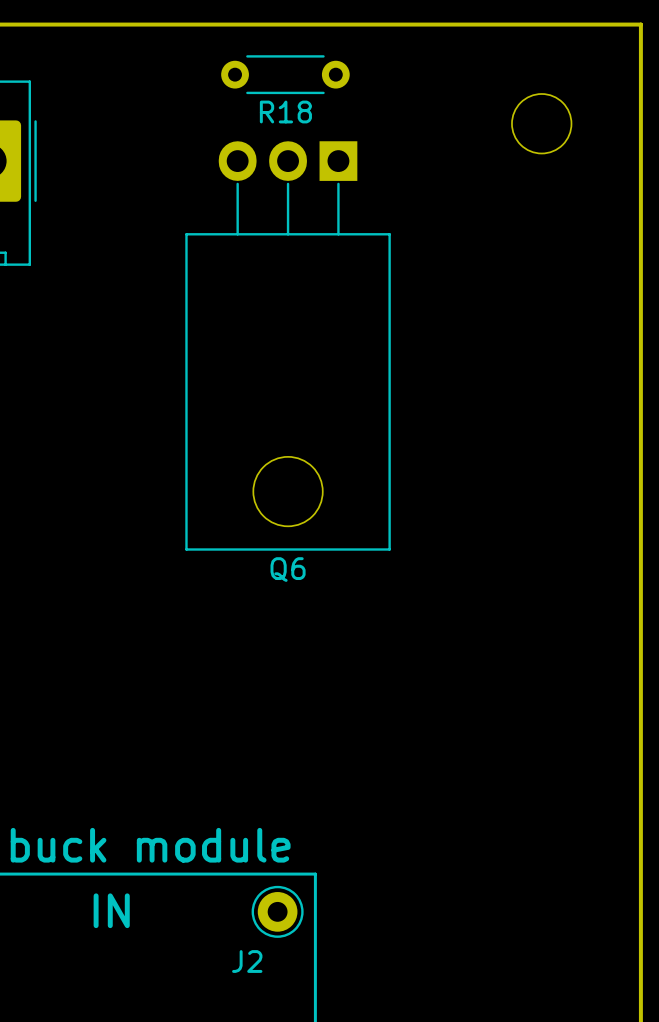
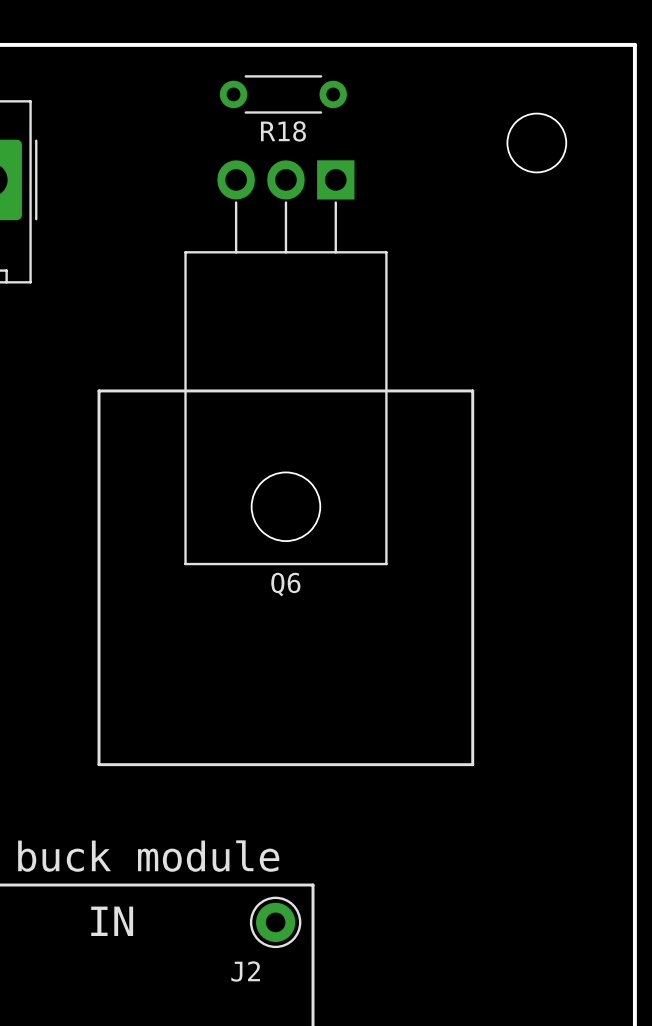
line: none -> (99, 390) (472, 390) (472, 764) (99, 764) (99, 390)

